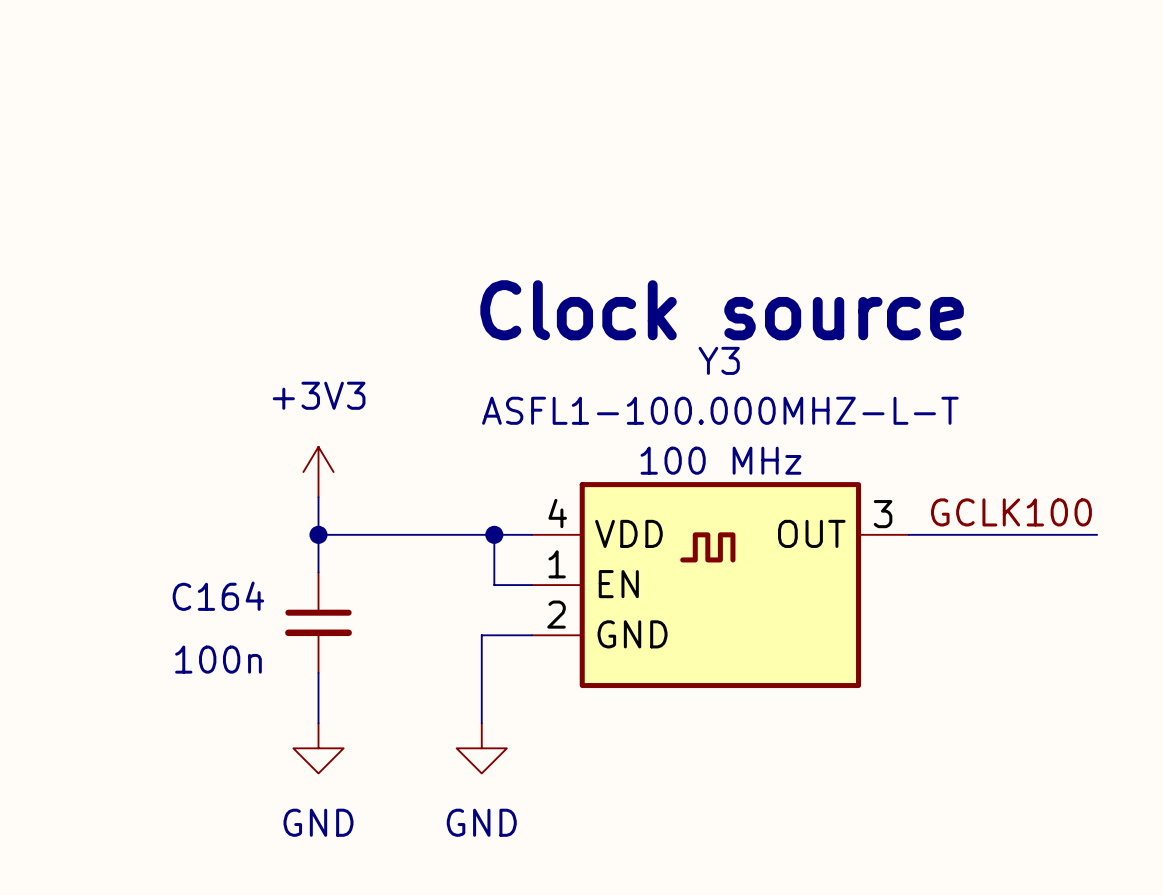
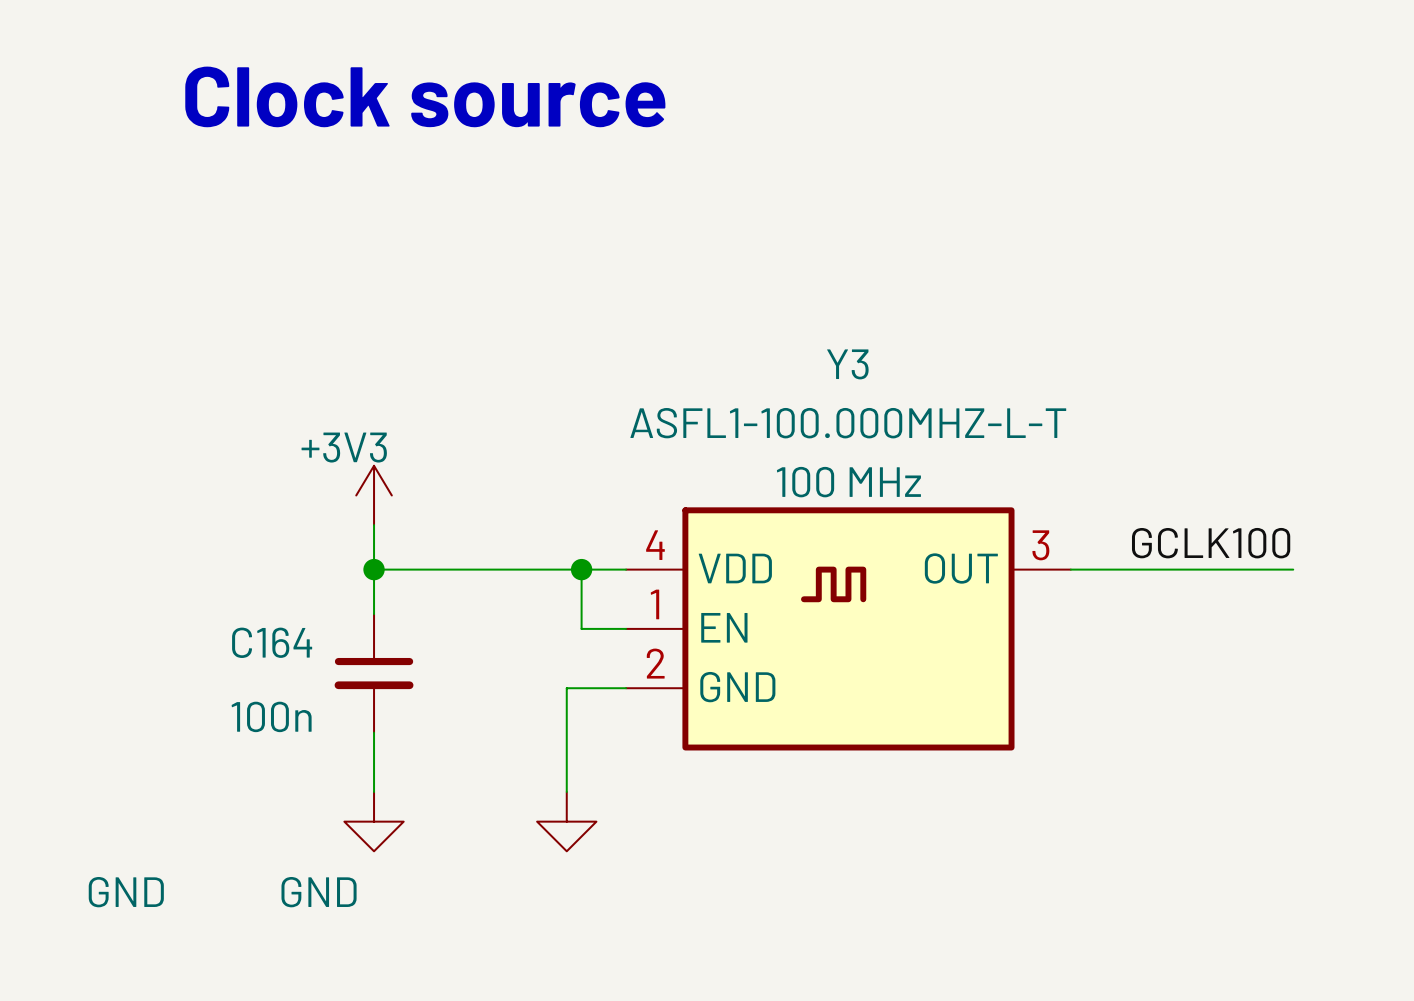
text position: Clock source (722, 310) -> Clock source (425, 96)
power symbol text position: +3V3 (319, 395) -> +3V3 (344, 447)
power symbol text position: GND (318, 822) -> GND (126, 892)
power symbol text position: GND (481, 822) -> GND (319, 892)

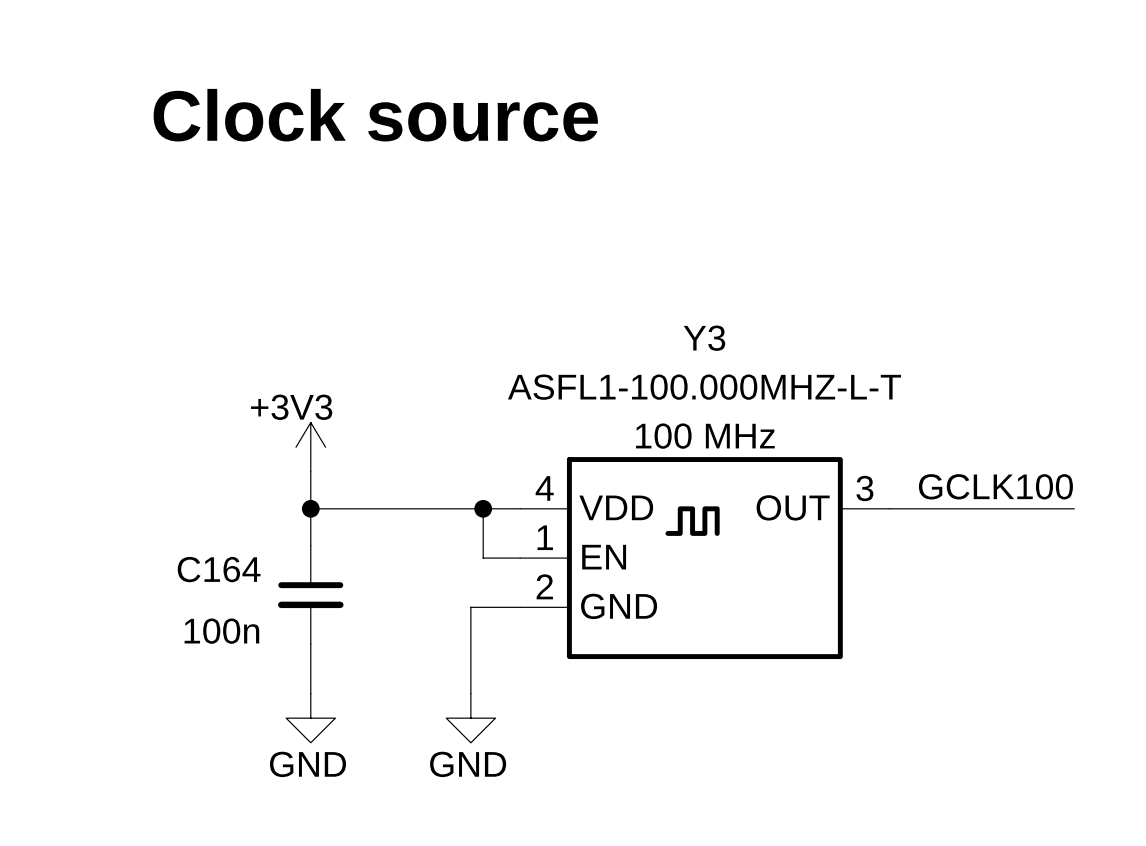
power symbol text position: GND (126, 892) -> GND (308, 764)
power symbol text position: GND (319, 892) -> GND (468, 764)

